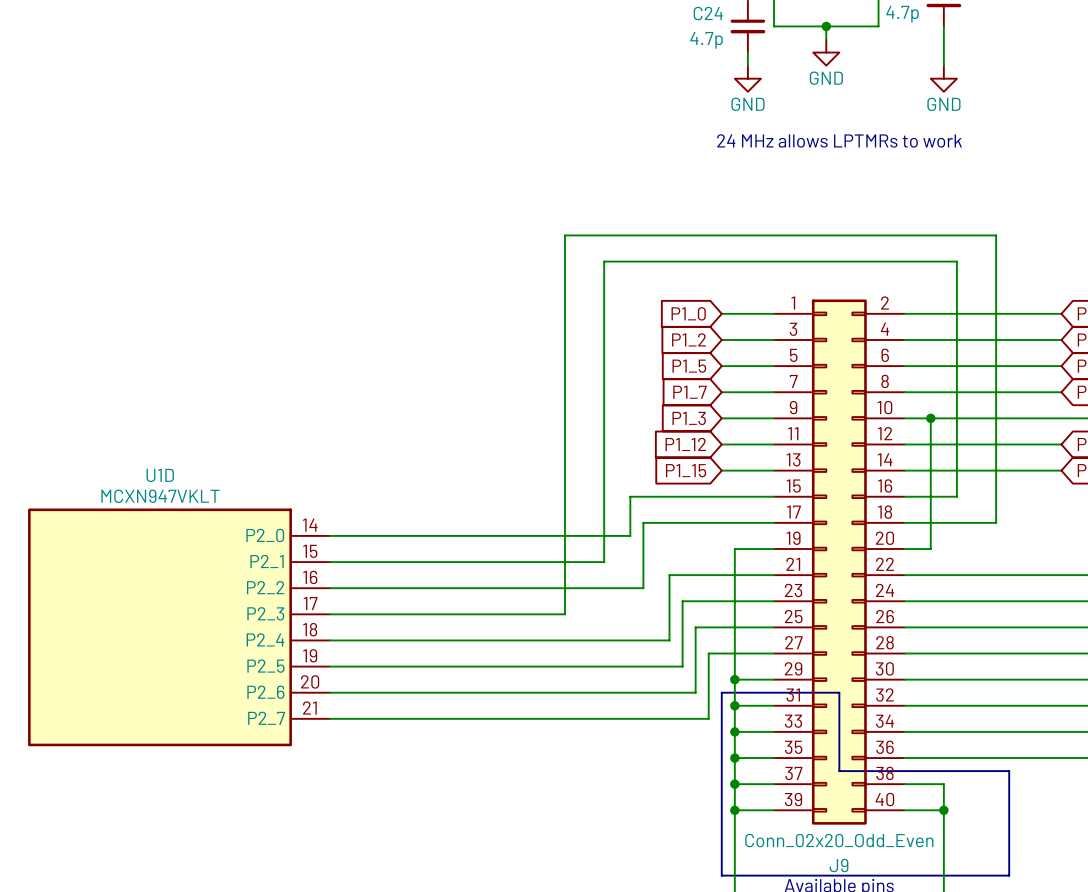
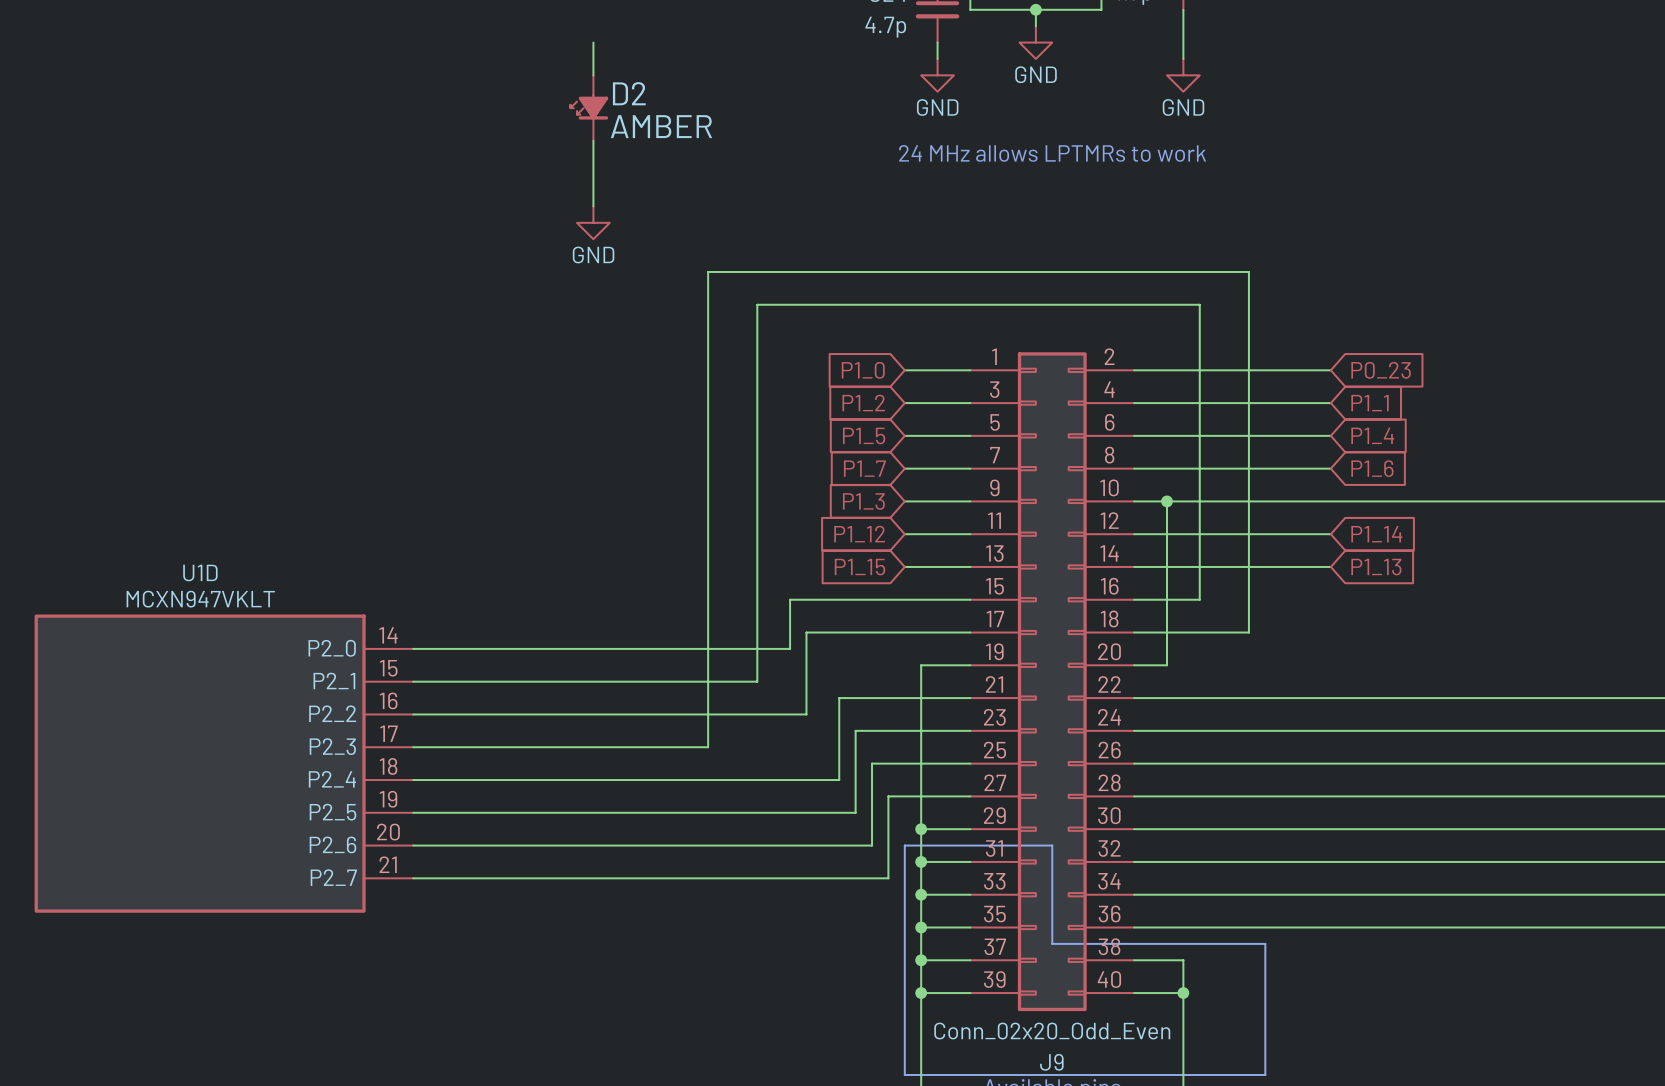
wire: none -> (593, 42) (593, 75)
D2: none -> AMBER (589, 108)
wire: none -> (593, 140) (593, 206)
power symbol: none -> GND (593, 222)

